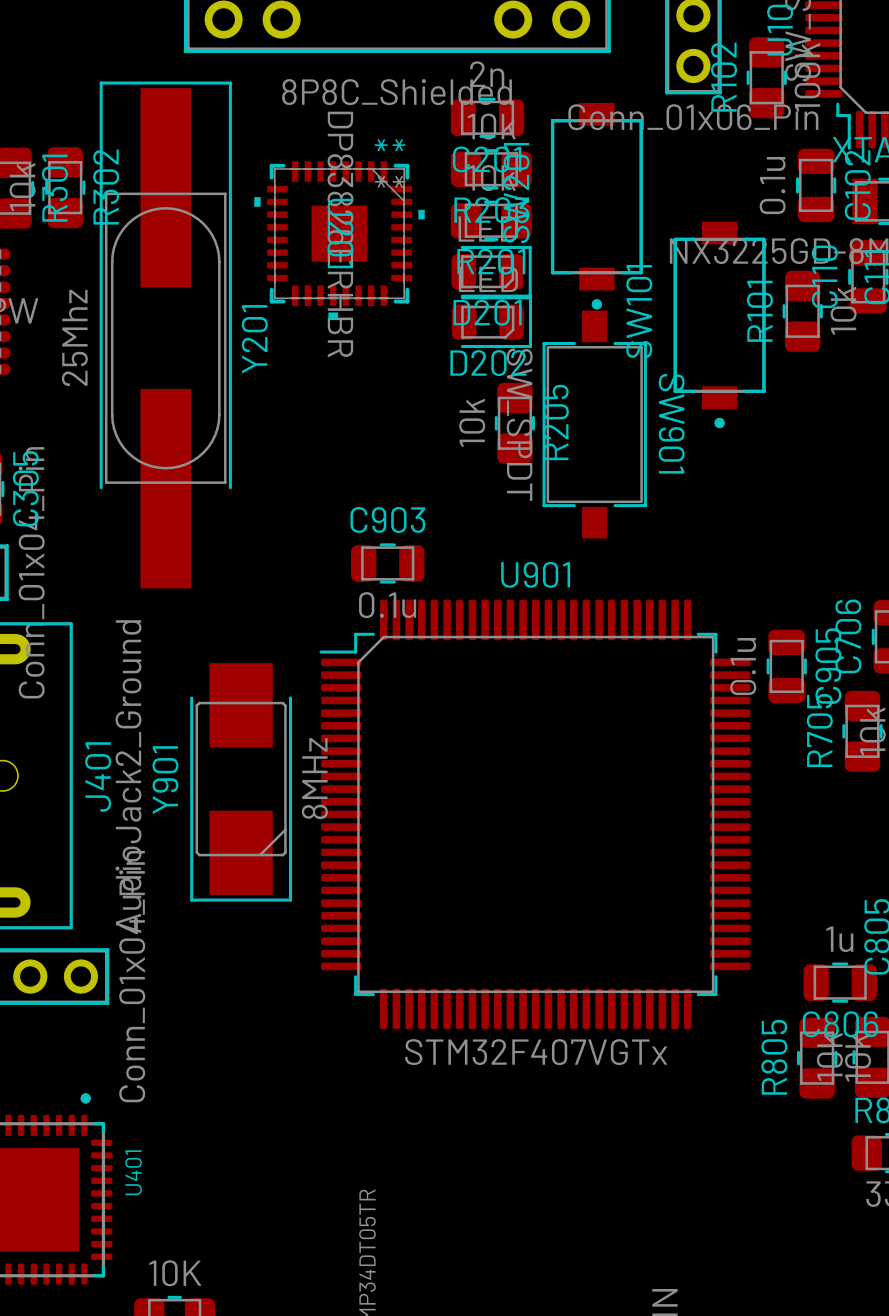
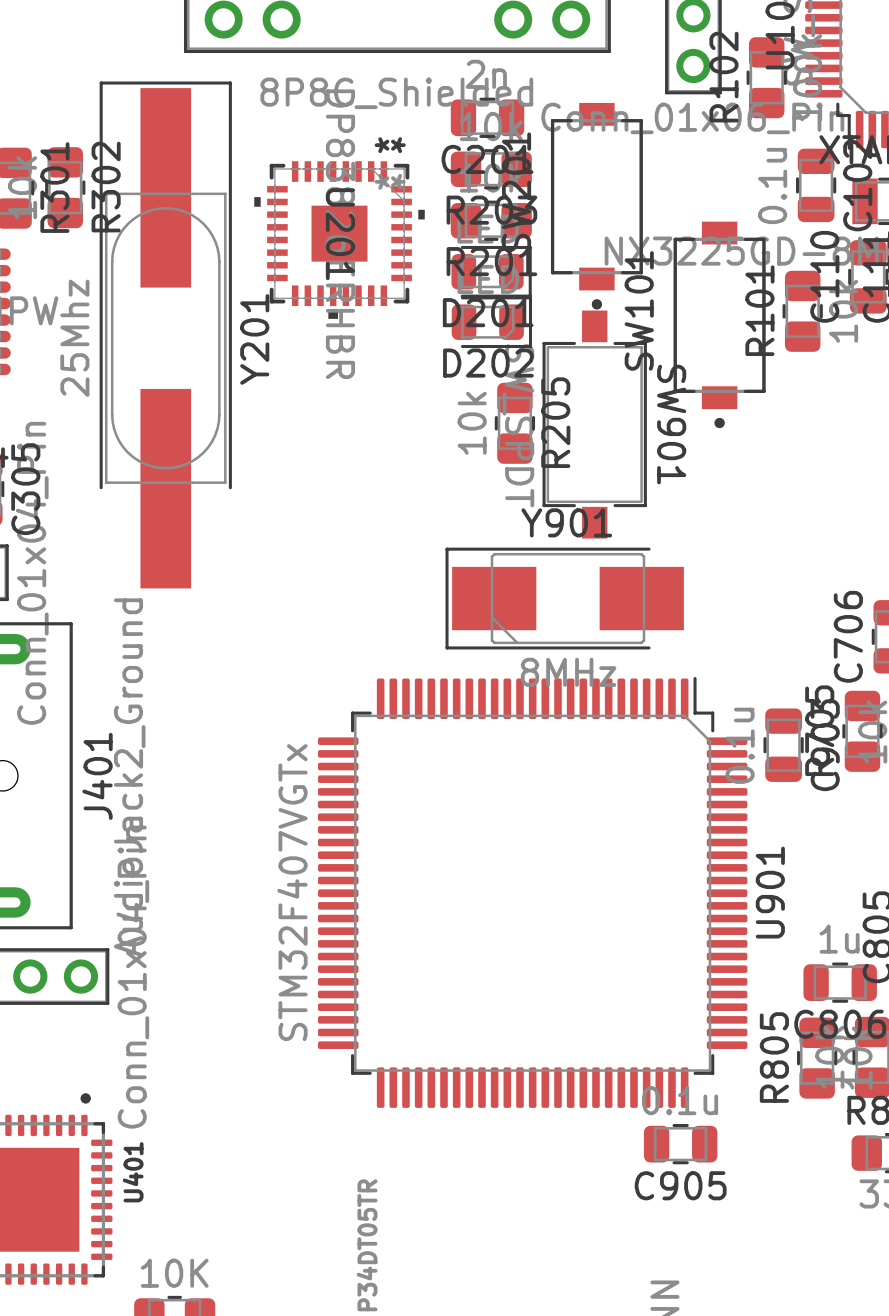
C903 rotation: 0° (387, 563) -> 90° clockwise (783, 745)
C903 position: (387, 563) -> (783, 745)
C905 rotation: 0° (786, 666) -> 90° clockwise (680, 1144)
C905 position: (786, 666) -> (680, 1144)
Y901 rotation: 0° (241, 782) -> 90° clockwise (564, 598)
Y901 position: (241, 782) -> (564, 598)
U901 rotation: 0° (535, 814) -> 90° clockwise (532, 892)

